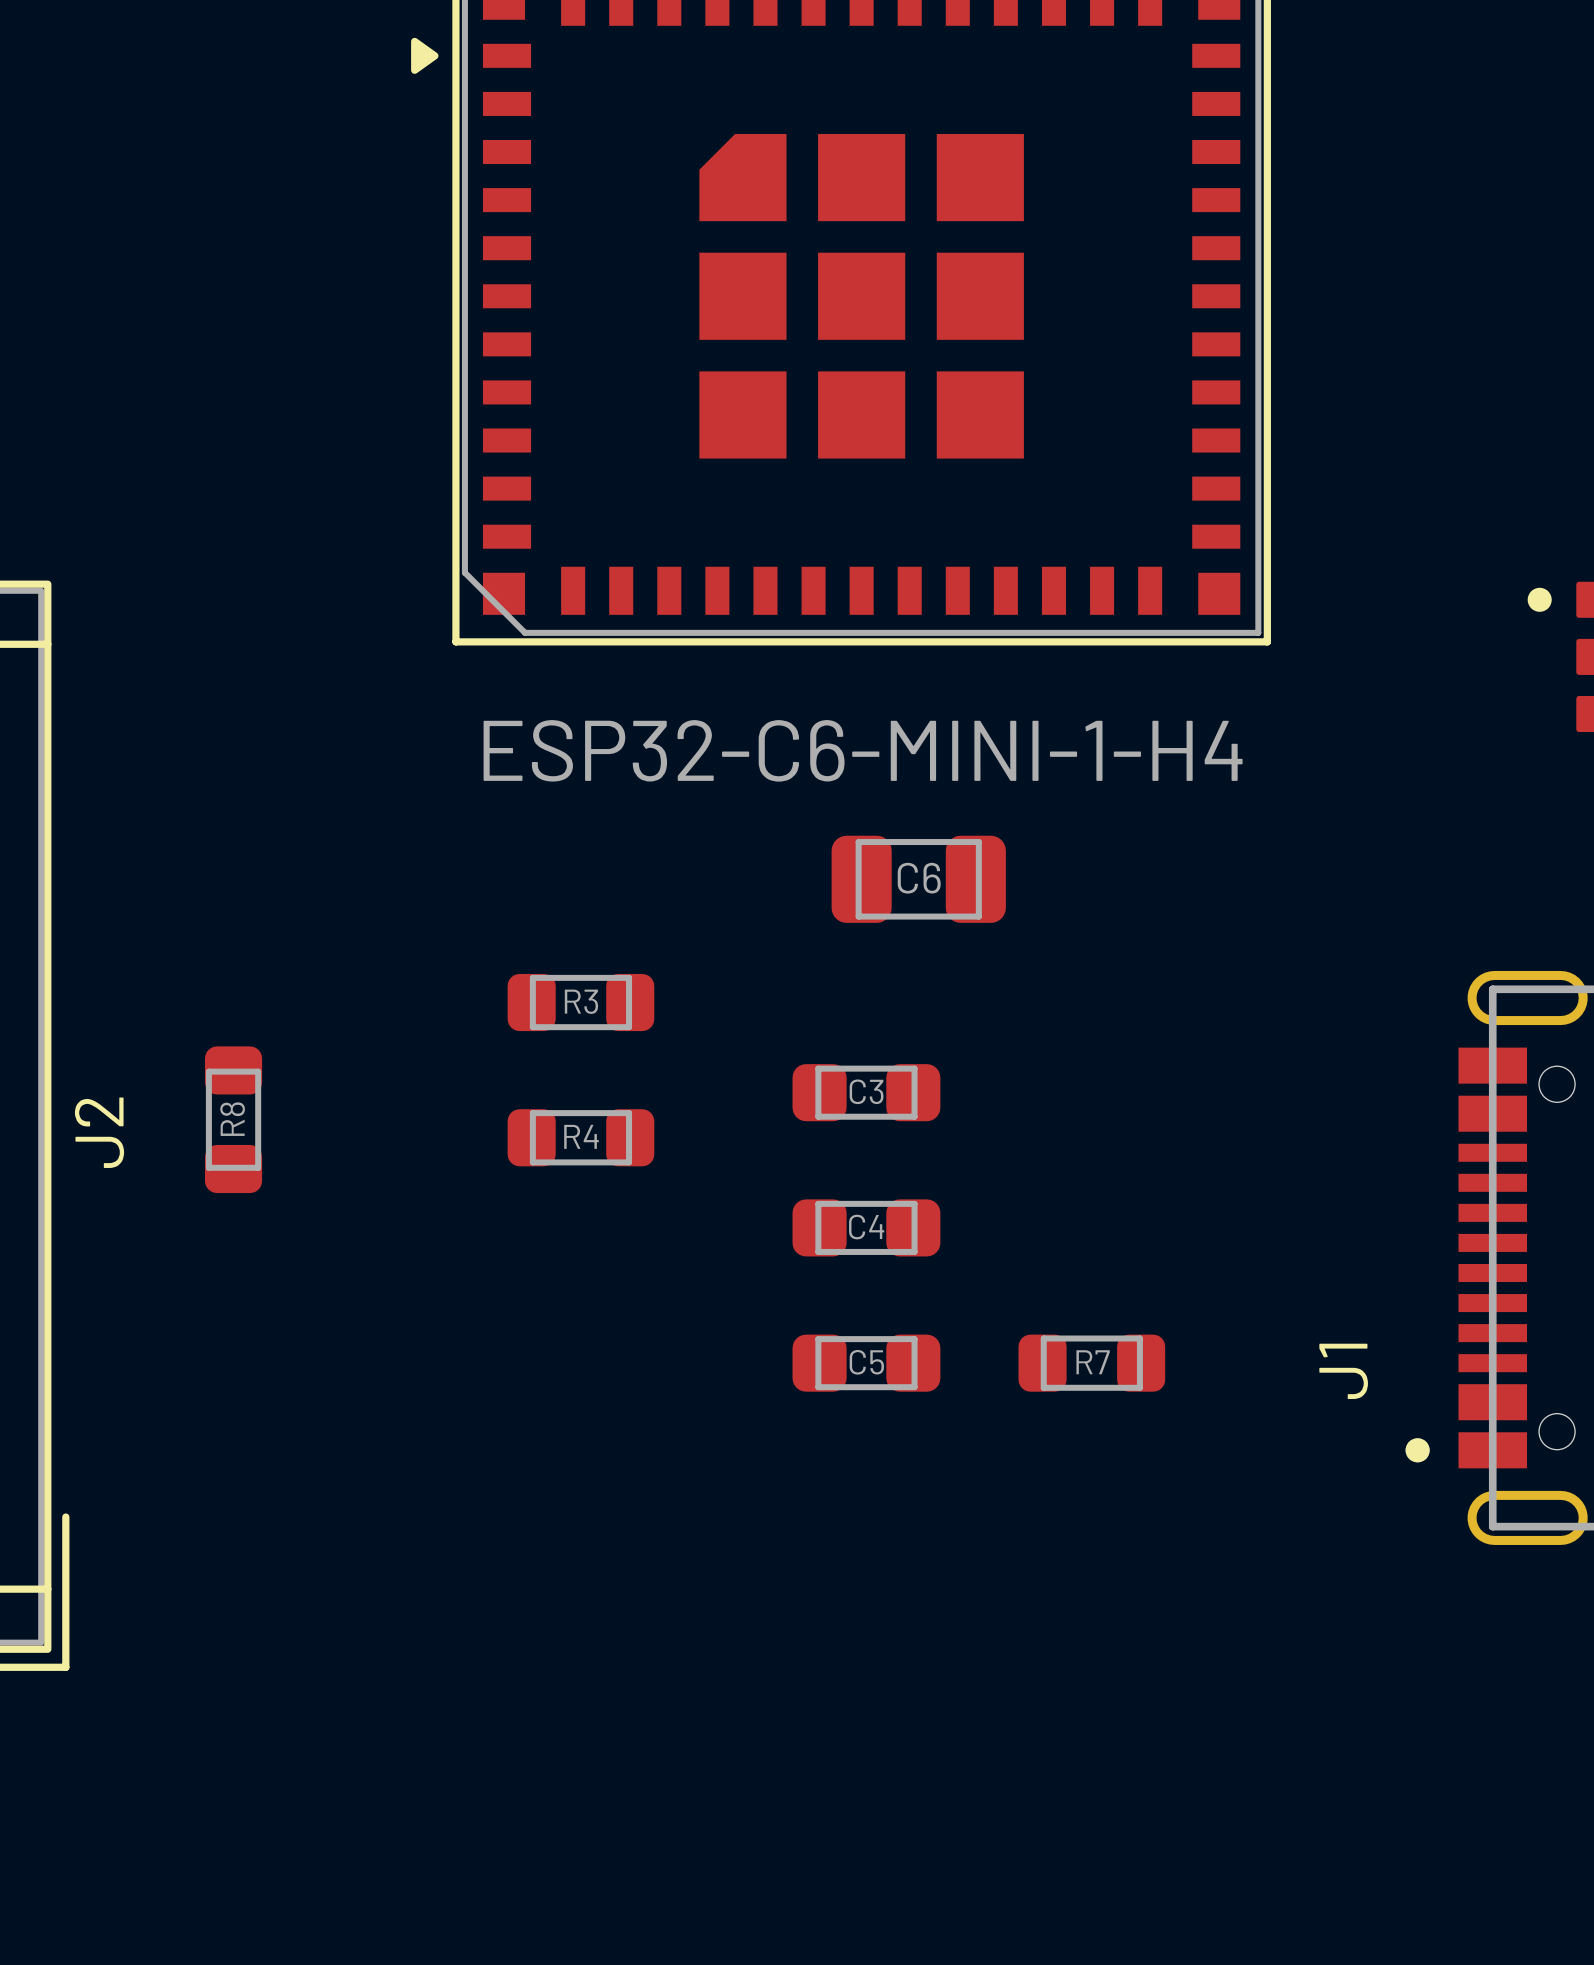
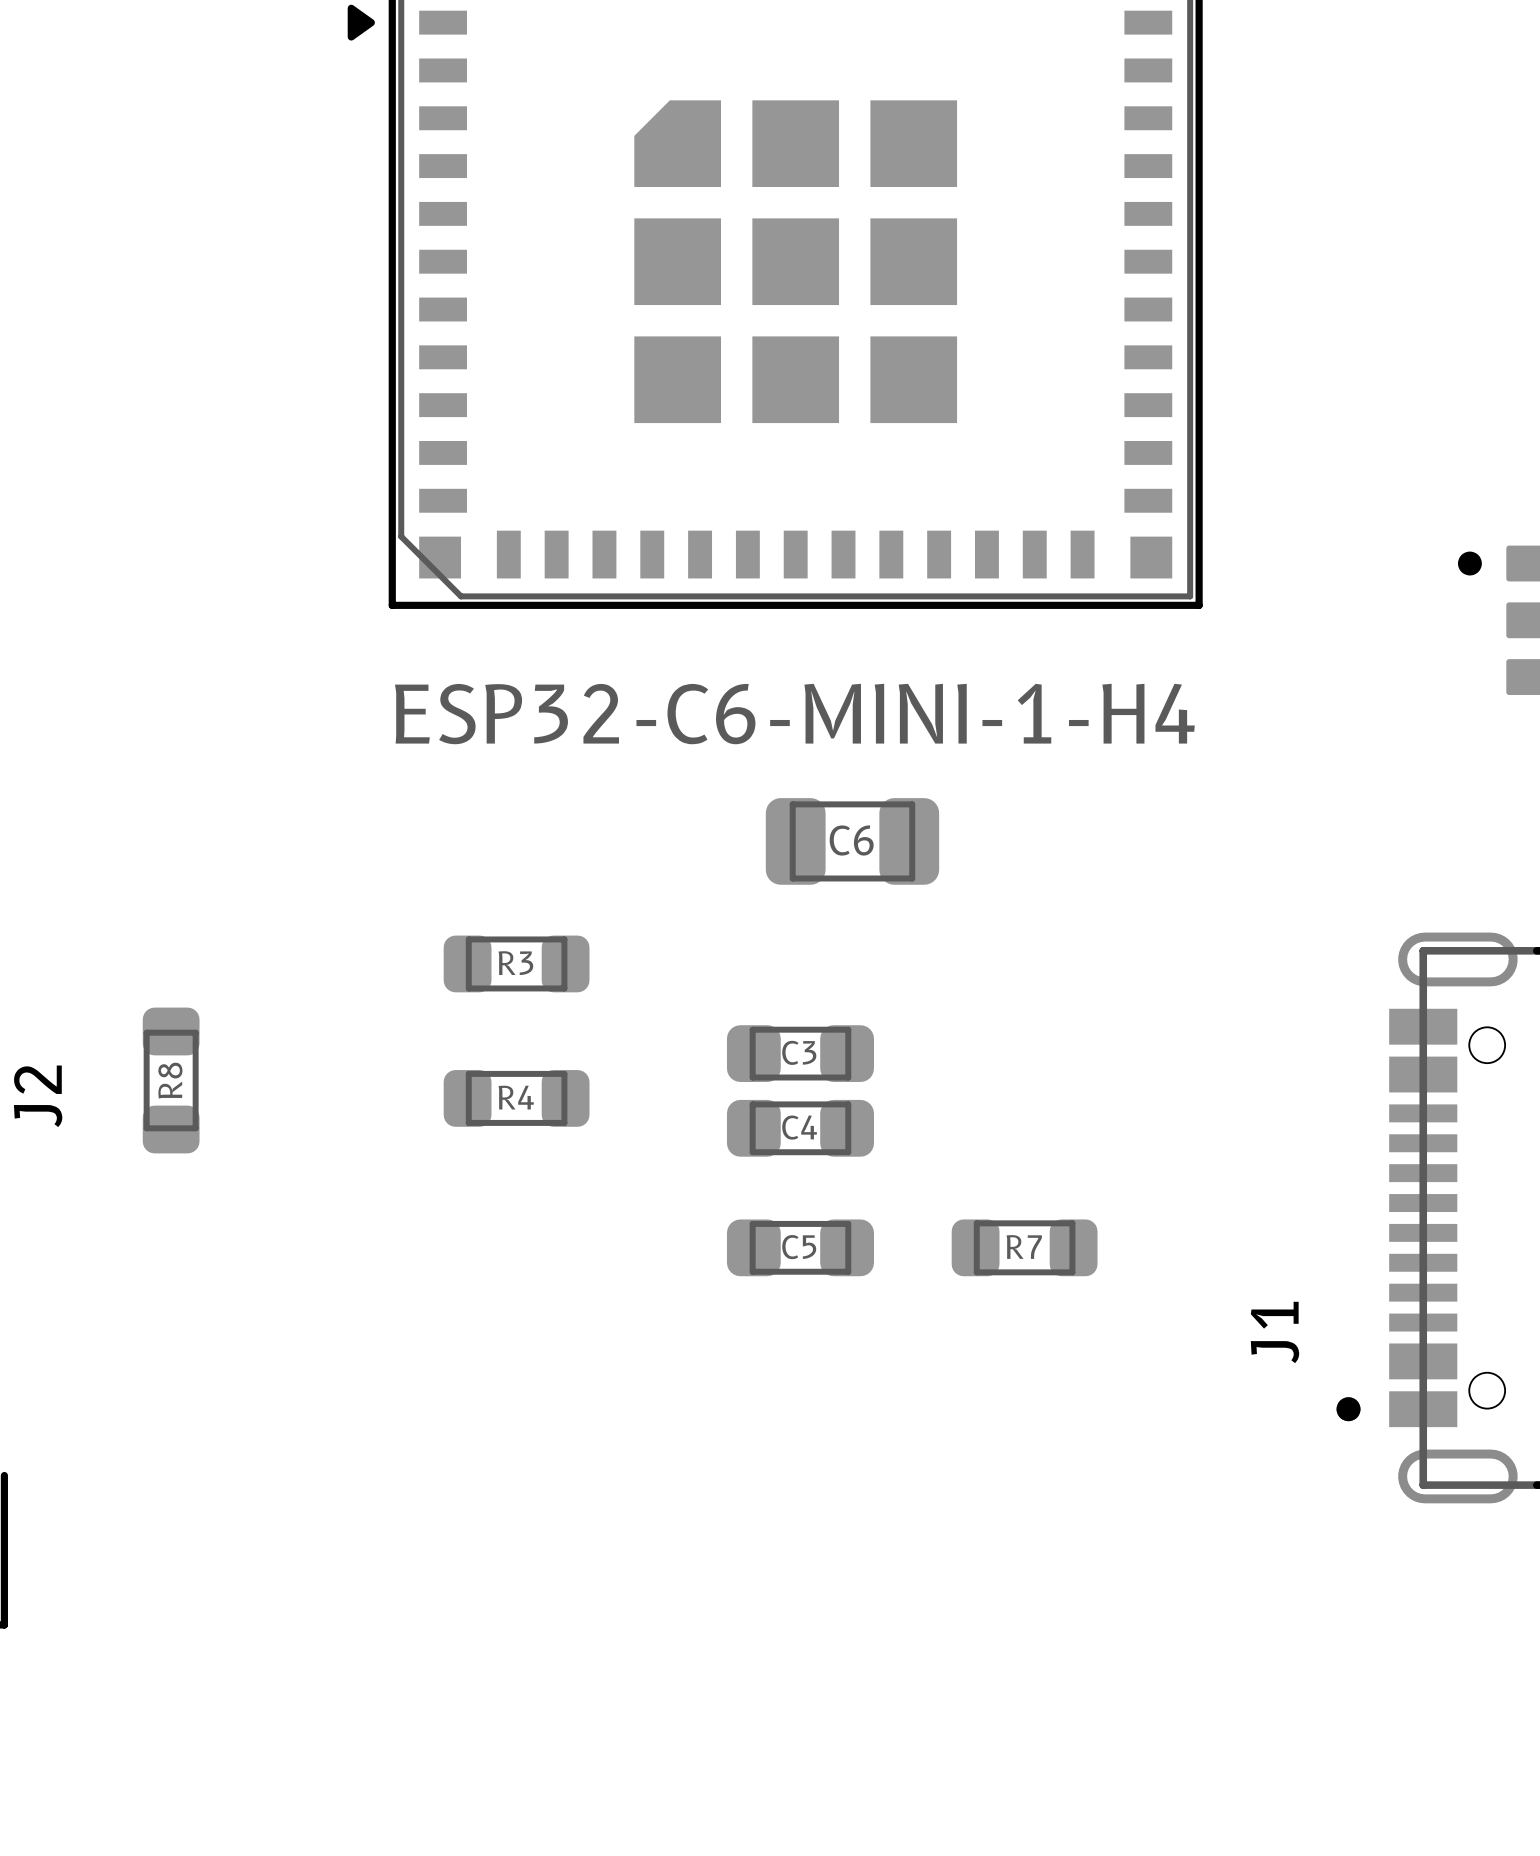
C4 position: (866, 1227) -> (800, 1128)
C5 position: (866, 1363) -> (800, 1247)
R7 position: (1091, 1363) -> (1024, 1247)

